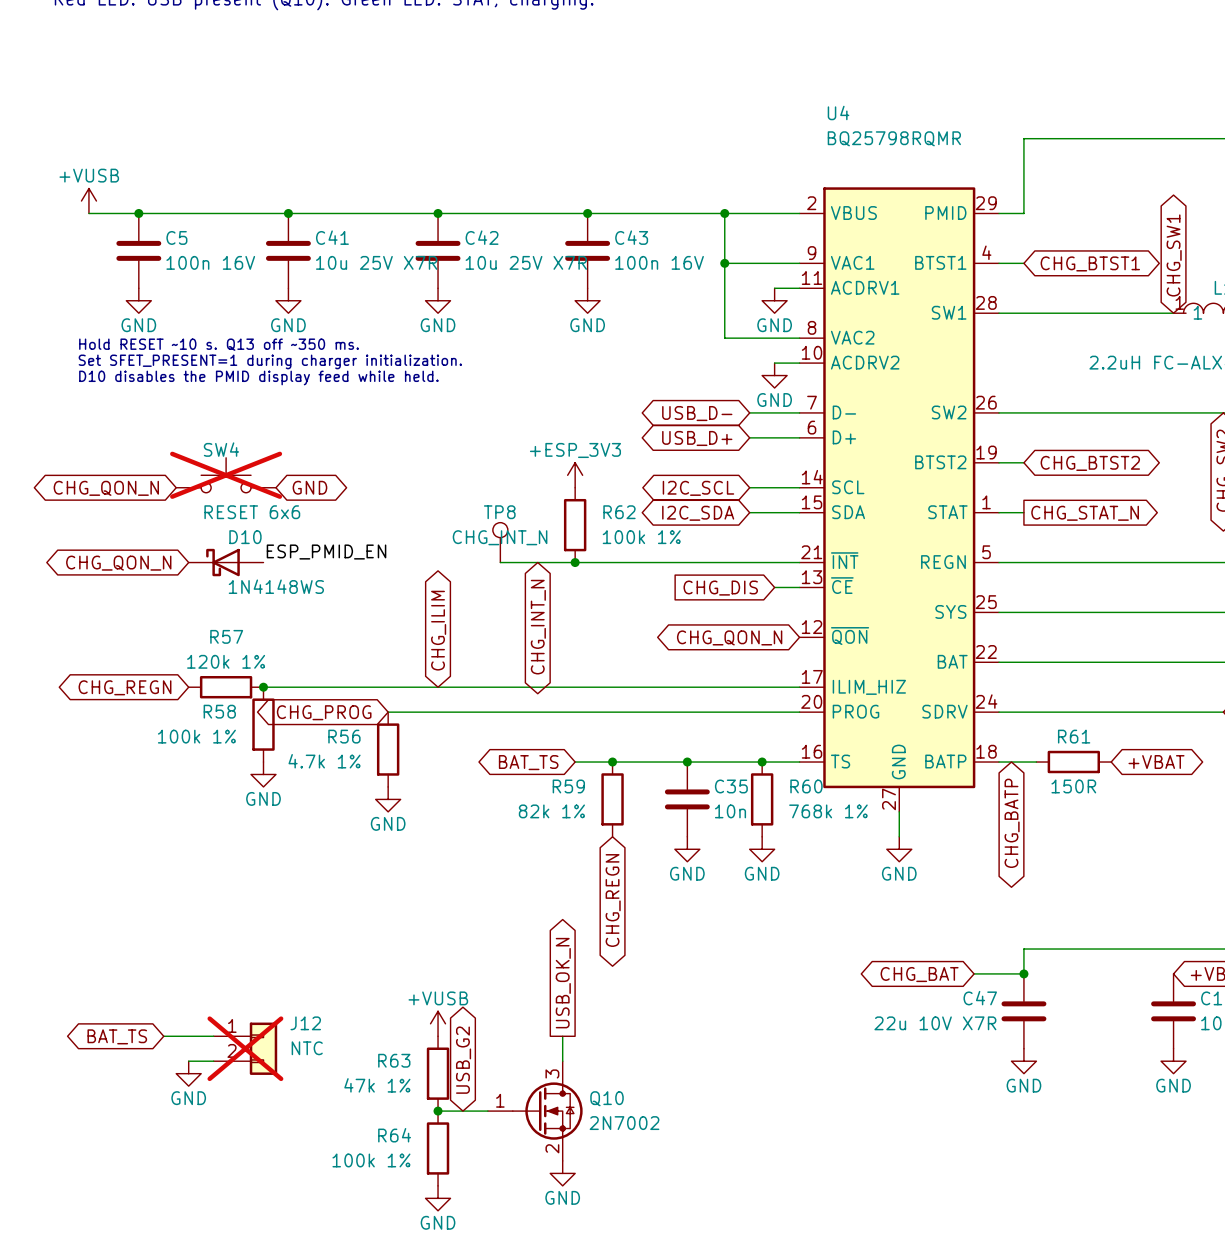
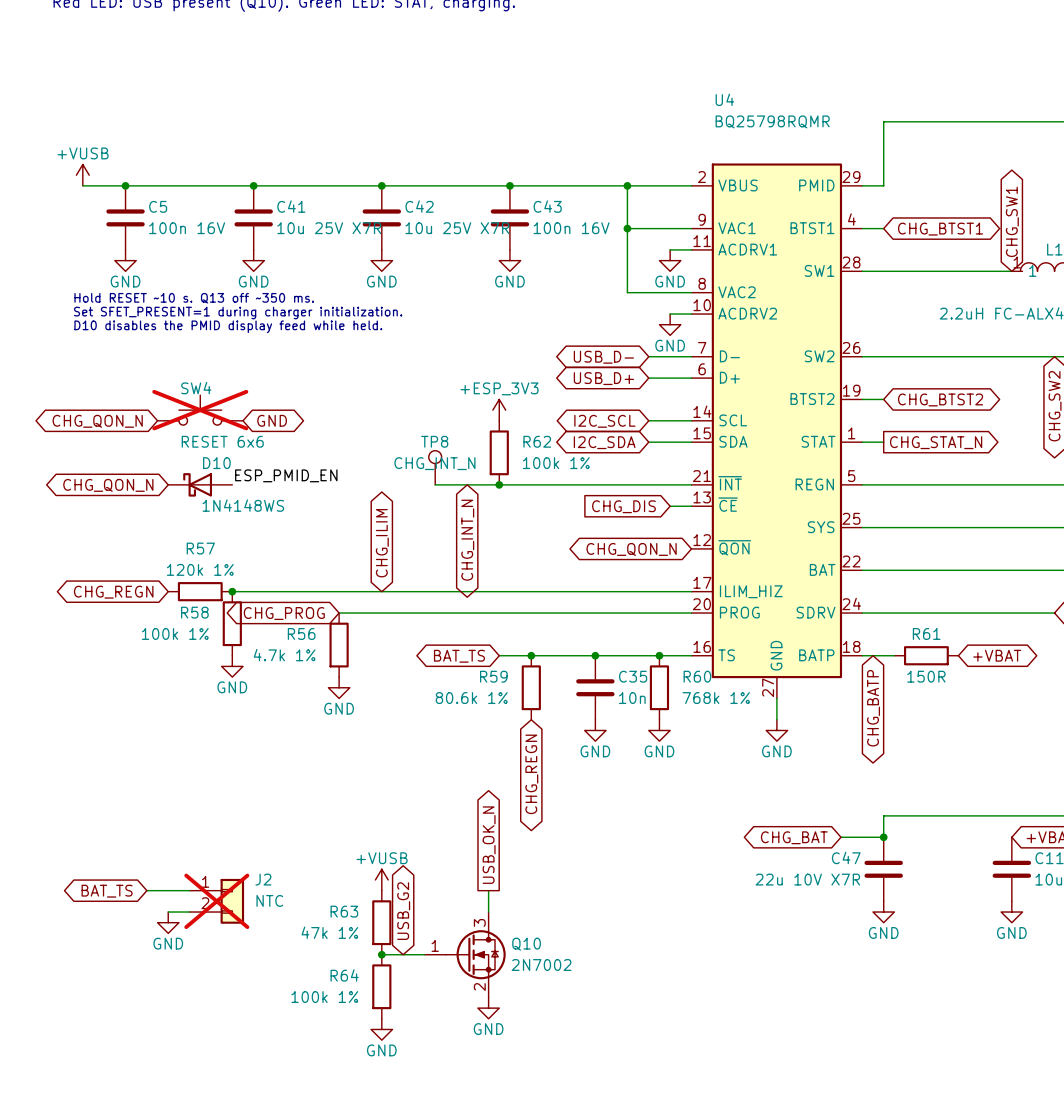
R59 value: 82k 1% (551, 811) -> 80.6k 1% (471, 698)
J12 name: J12 (305, 1023) -> J2 (263, 879)

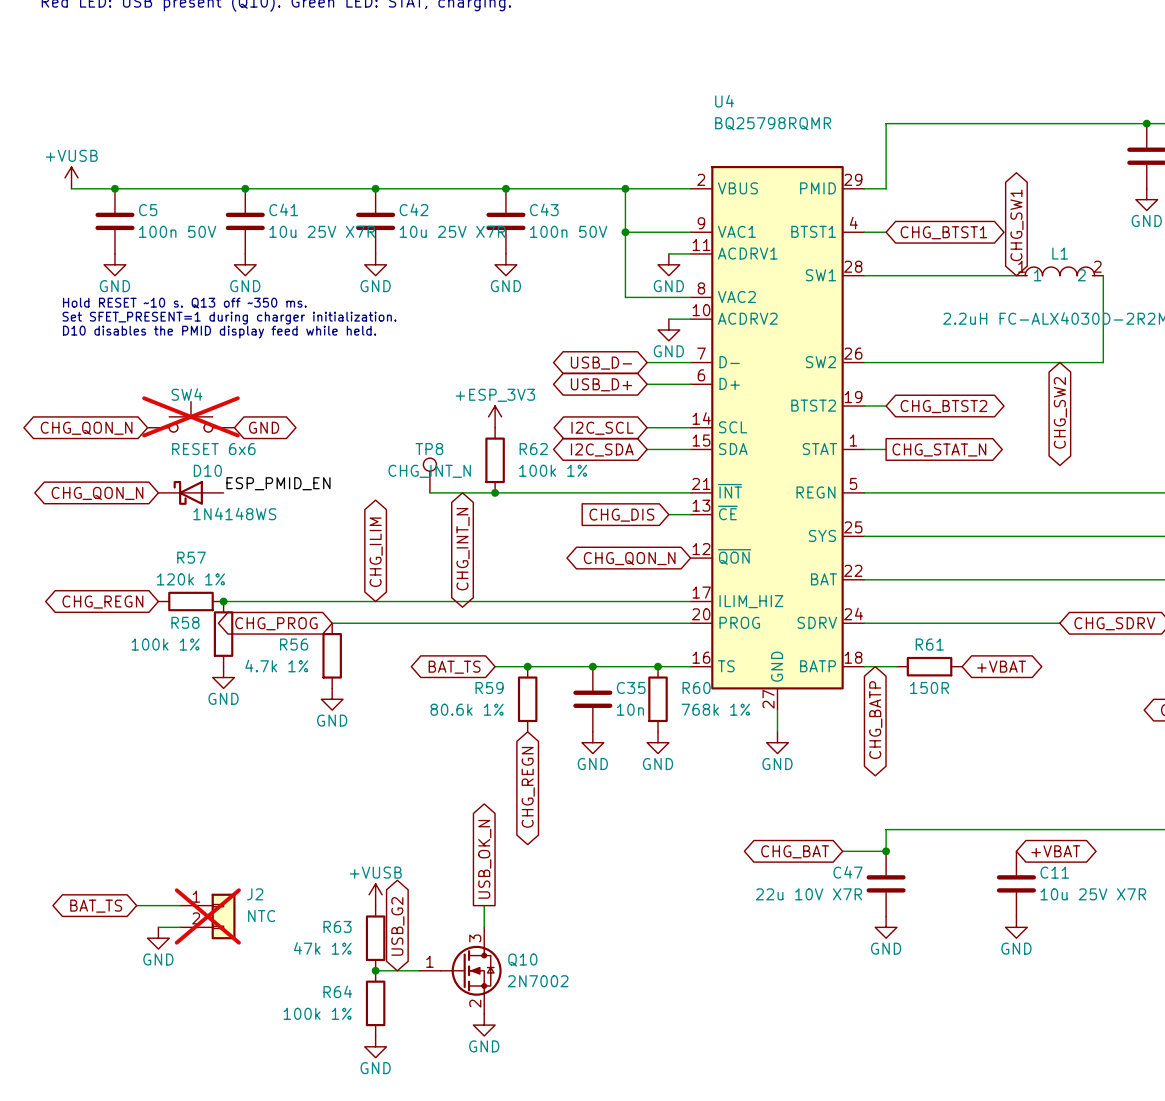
C5 value: 100n 16V (187, 228) -> 100n 50V (177, 231)
C43 value: 100n 16V (571, 228) -> 100n 50V (568, 231)

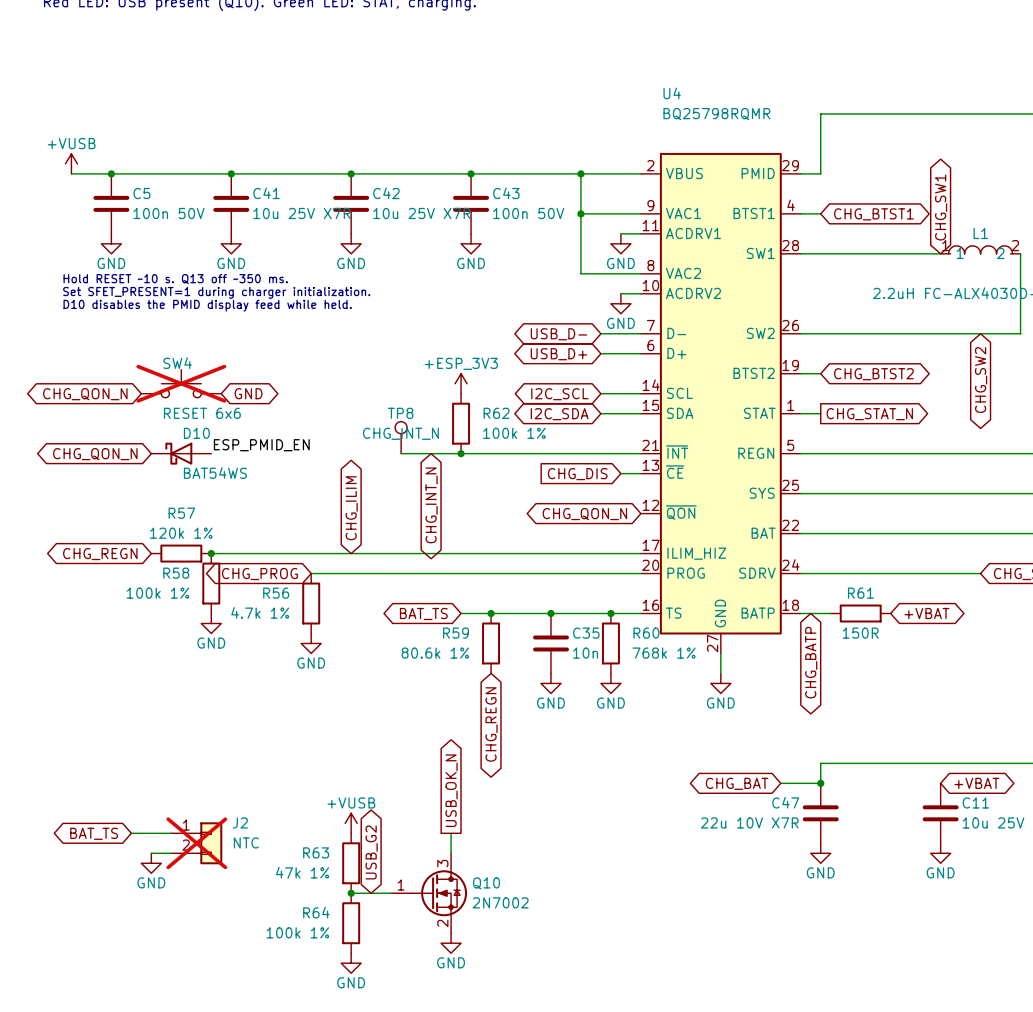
D10 value: 1N4148WS (234, 513) -> BAT54WS (215, 473)

